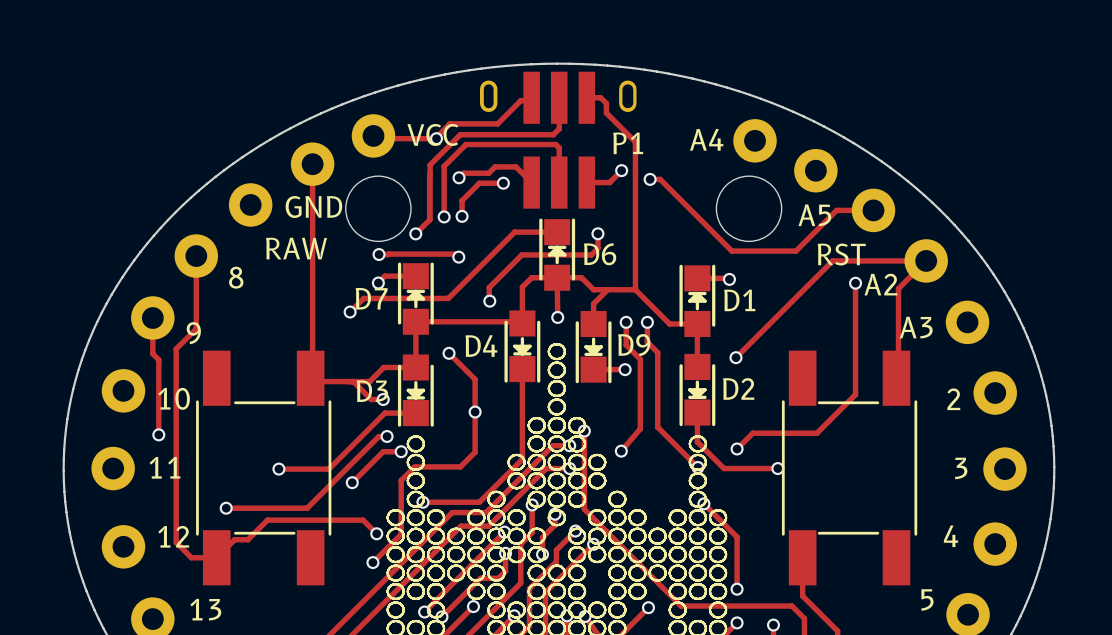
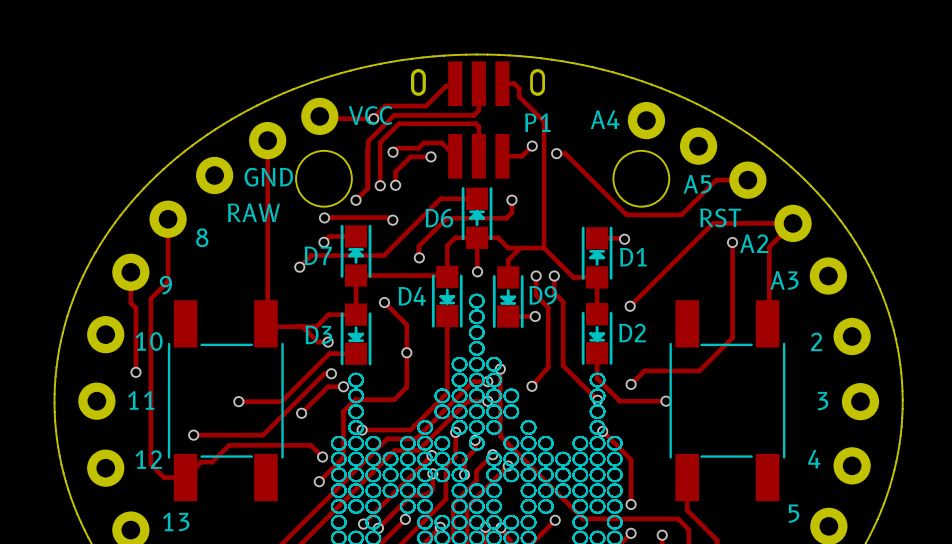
D6 name position: D6 (600, 254) -> D6 (439, 218)

